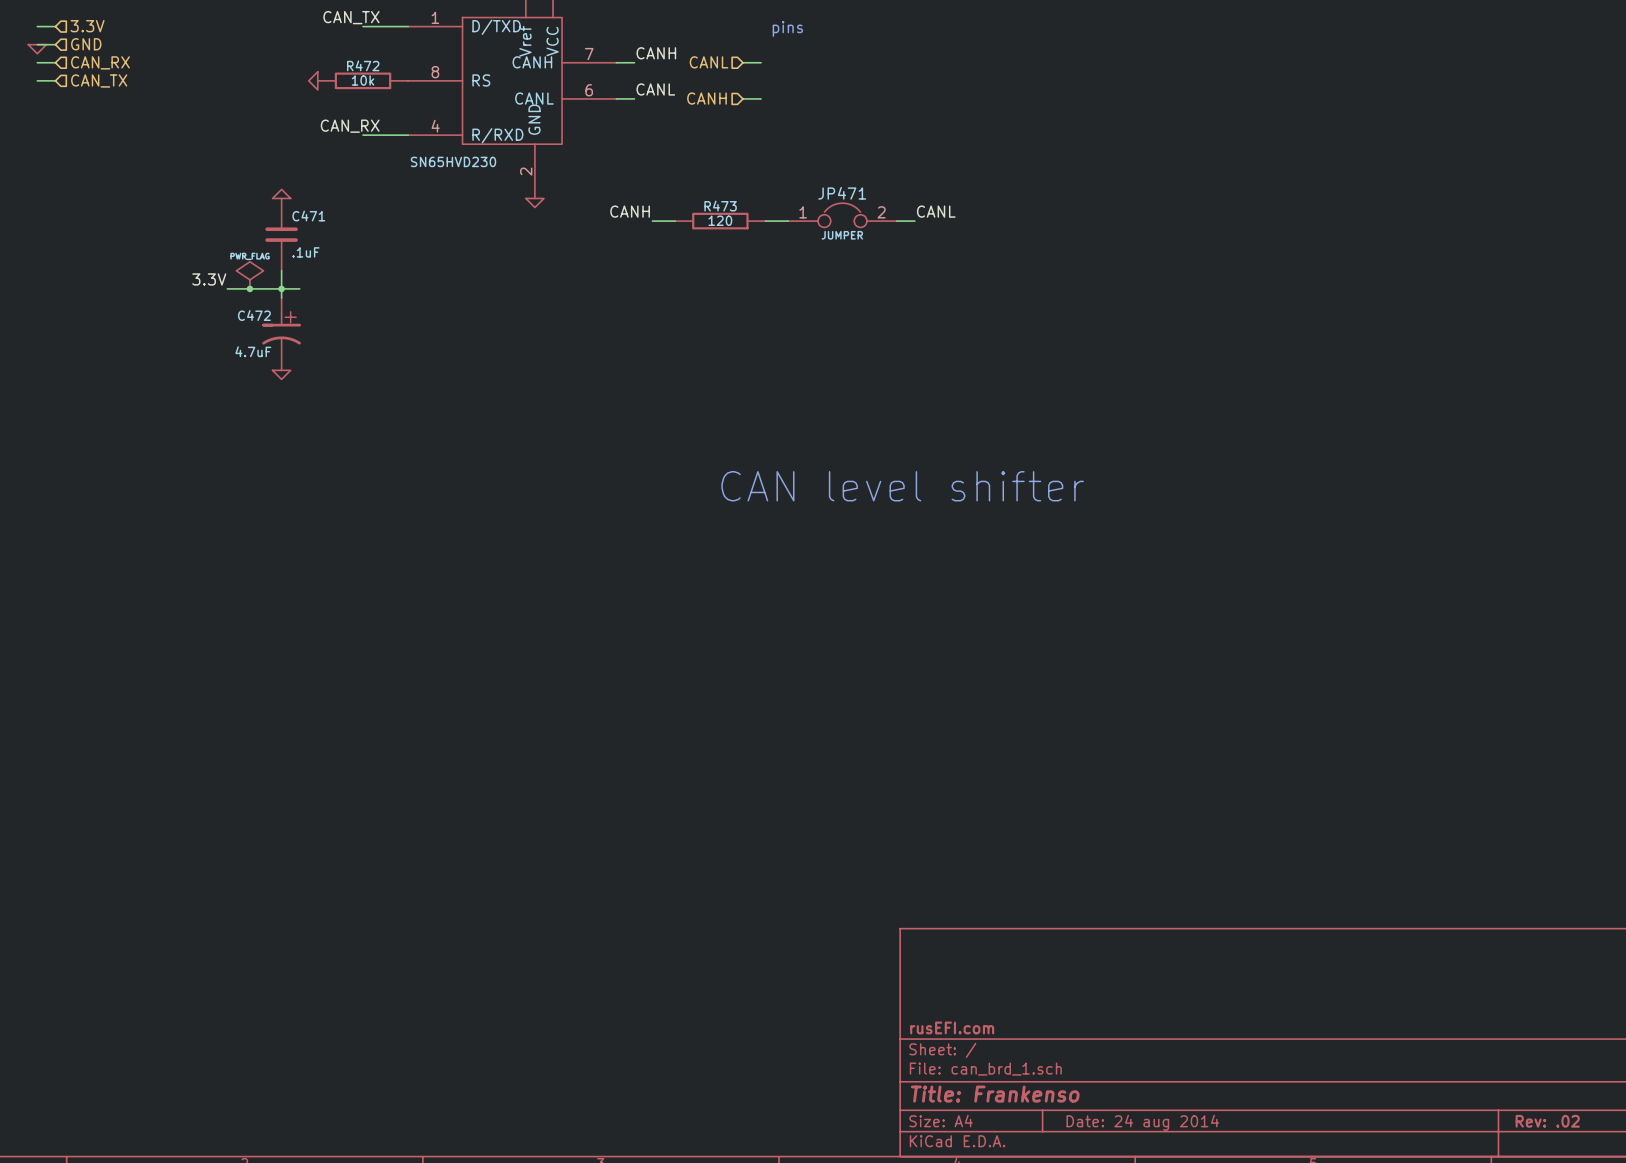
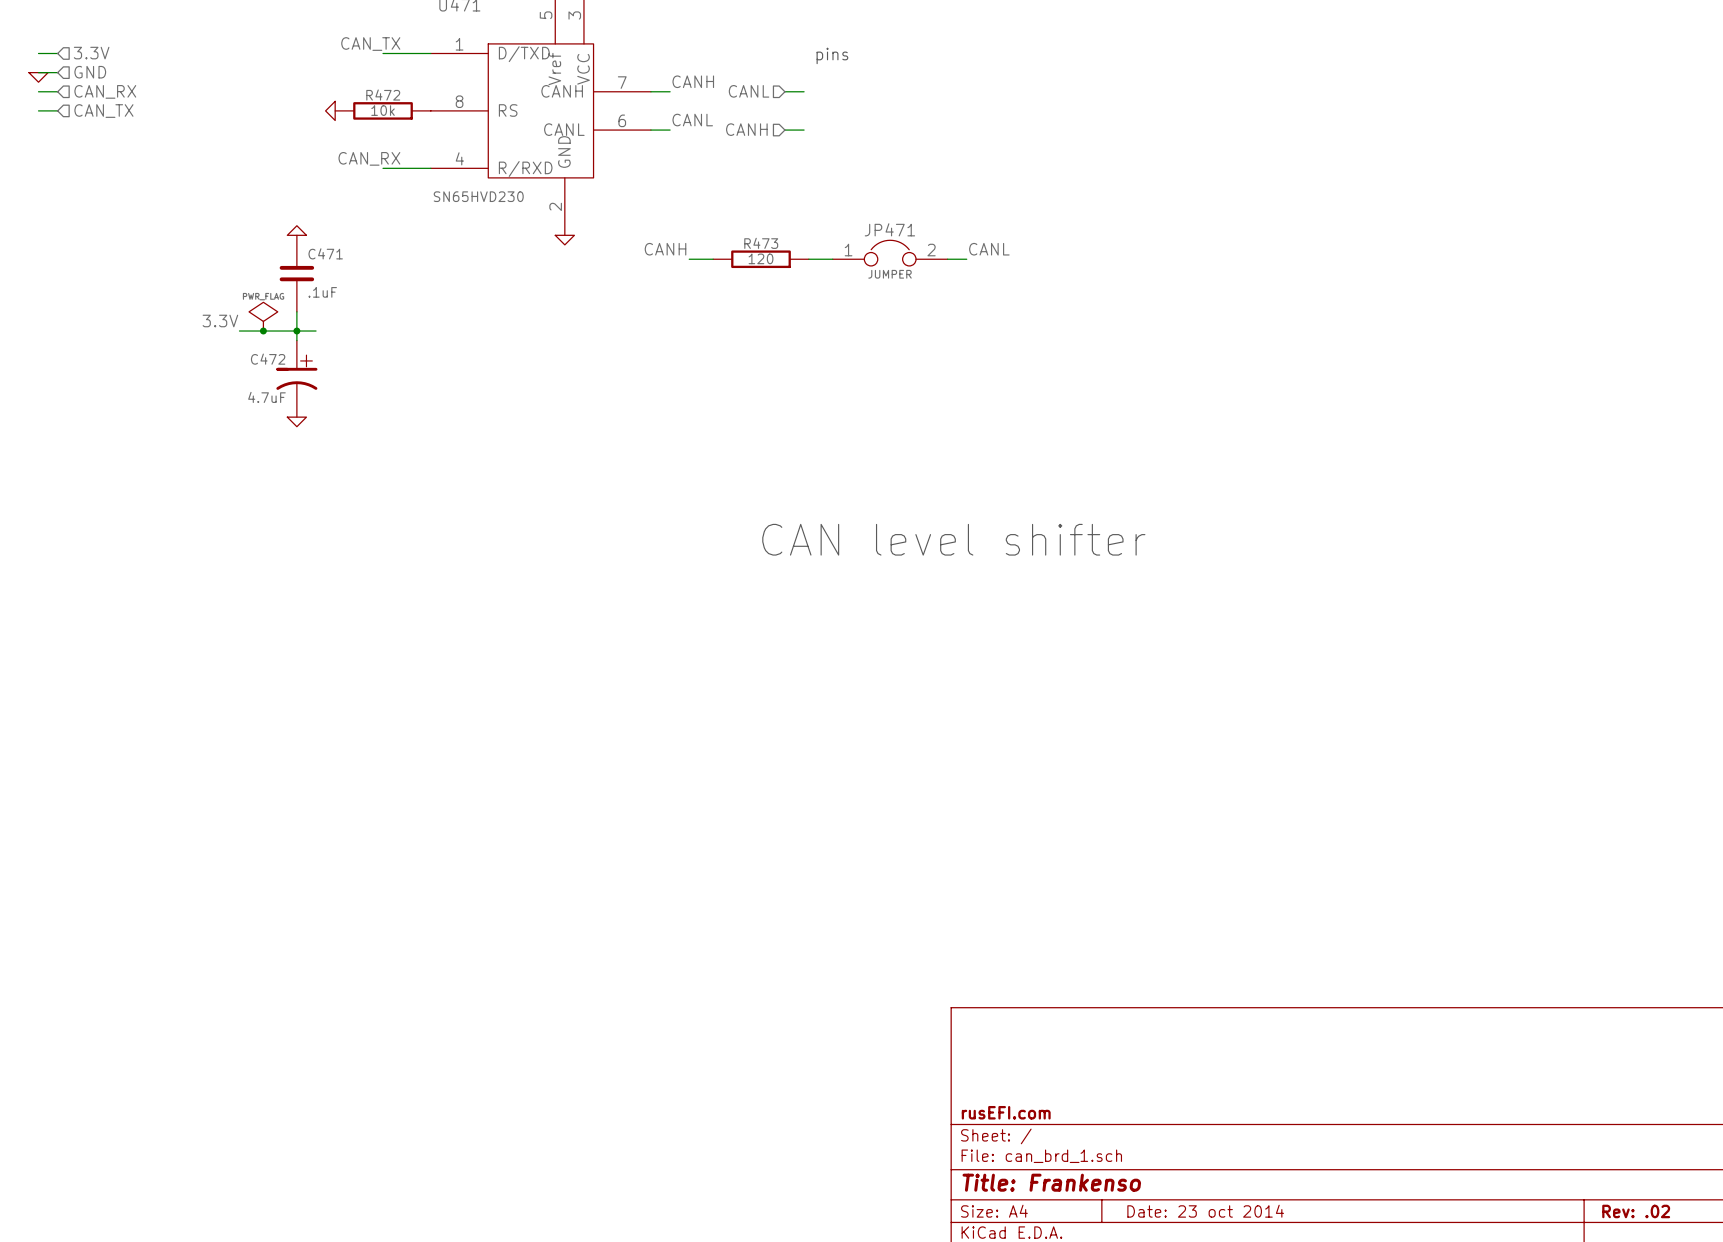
title block: Date: 24 aug 2014 (1142, 1122) -> Date: 23 oct 2014 (1205, 1211)

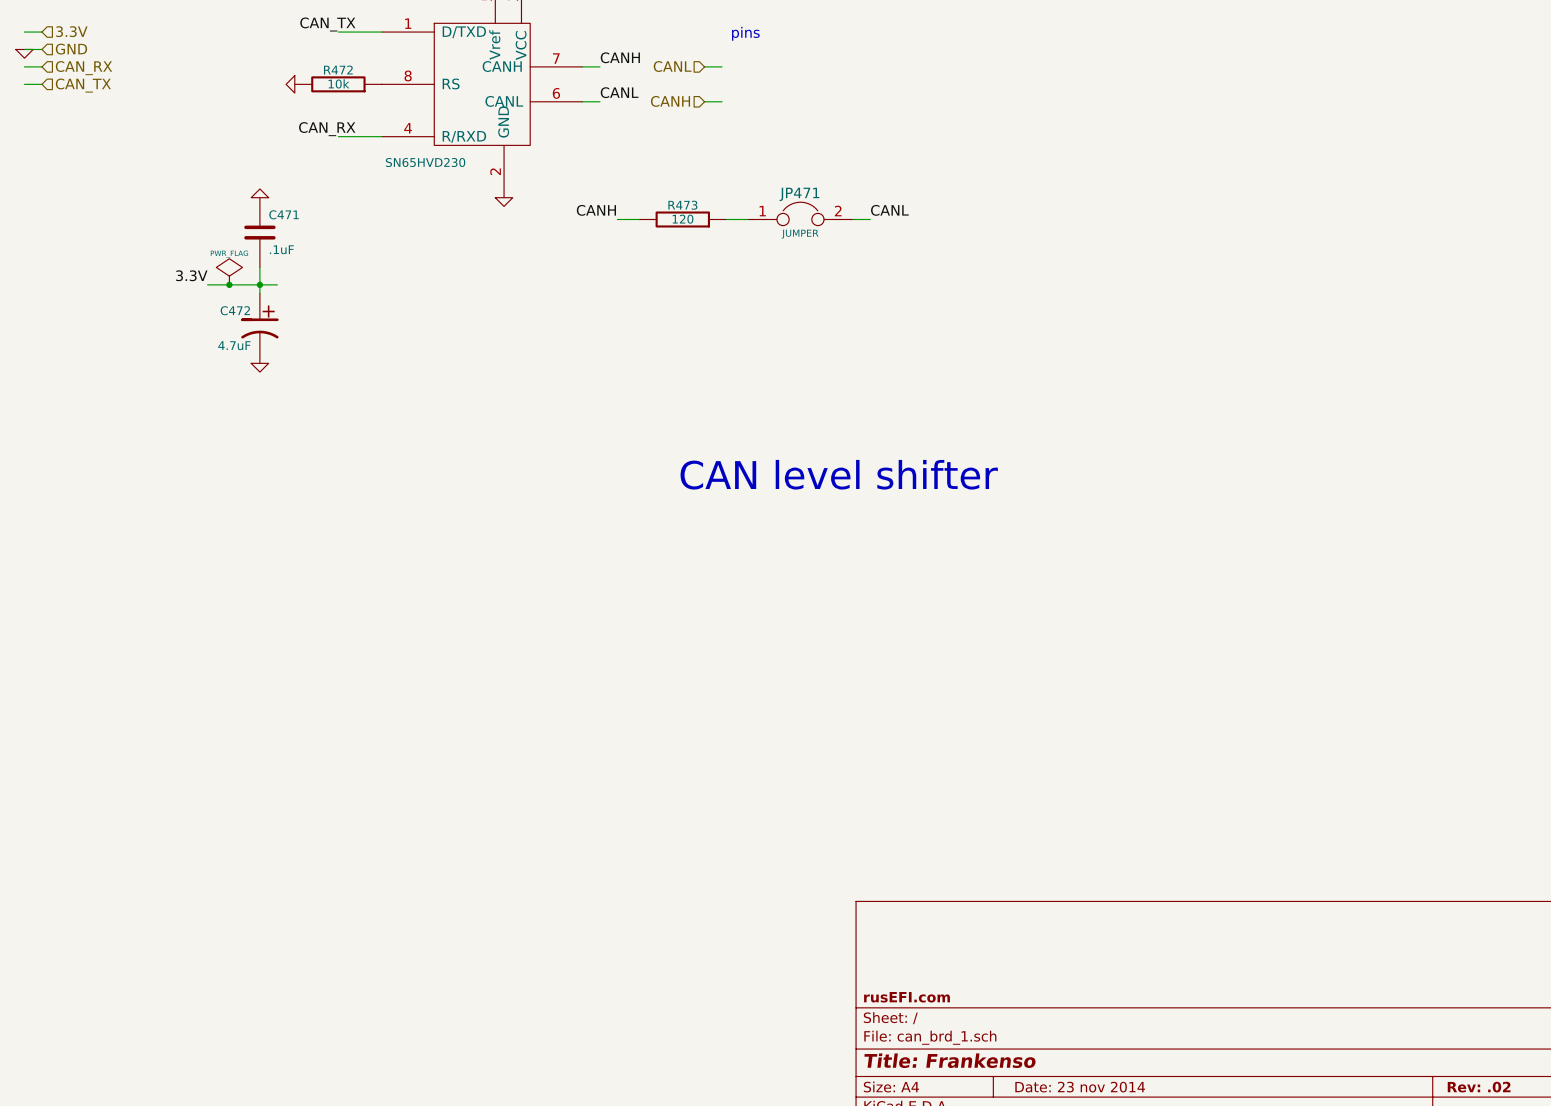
title block: Date: 23 oct 2014 (1205, 1211) -> Date: 23 nov 2014 (1080, 1087)

